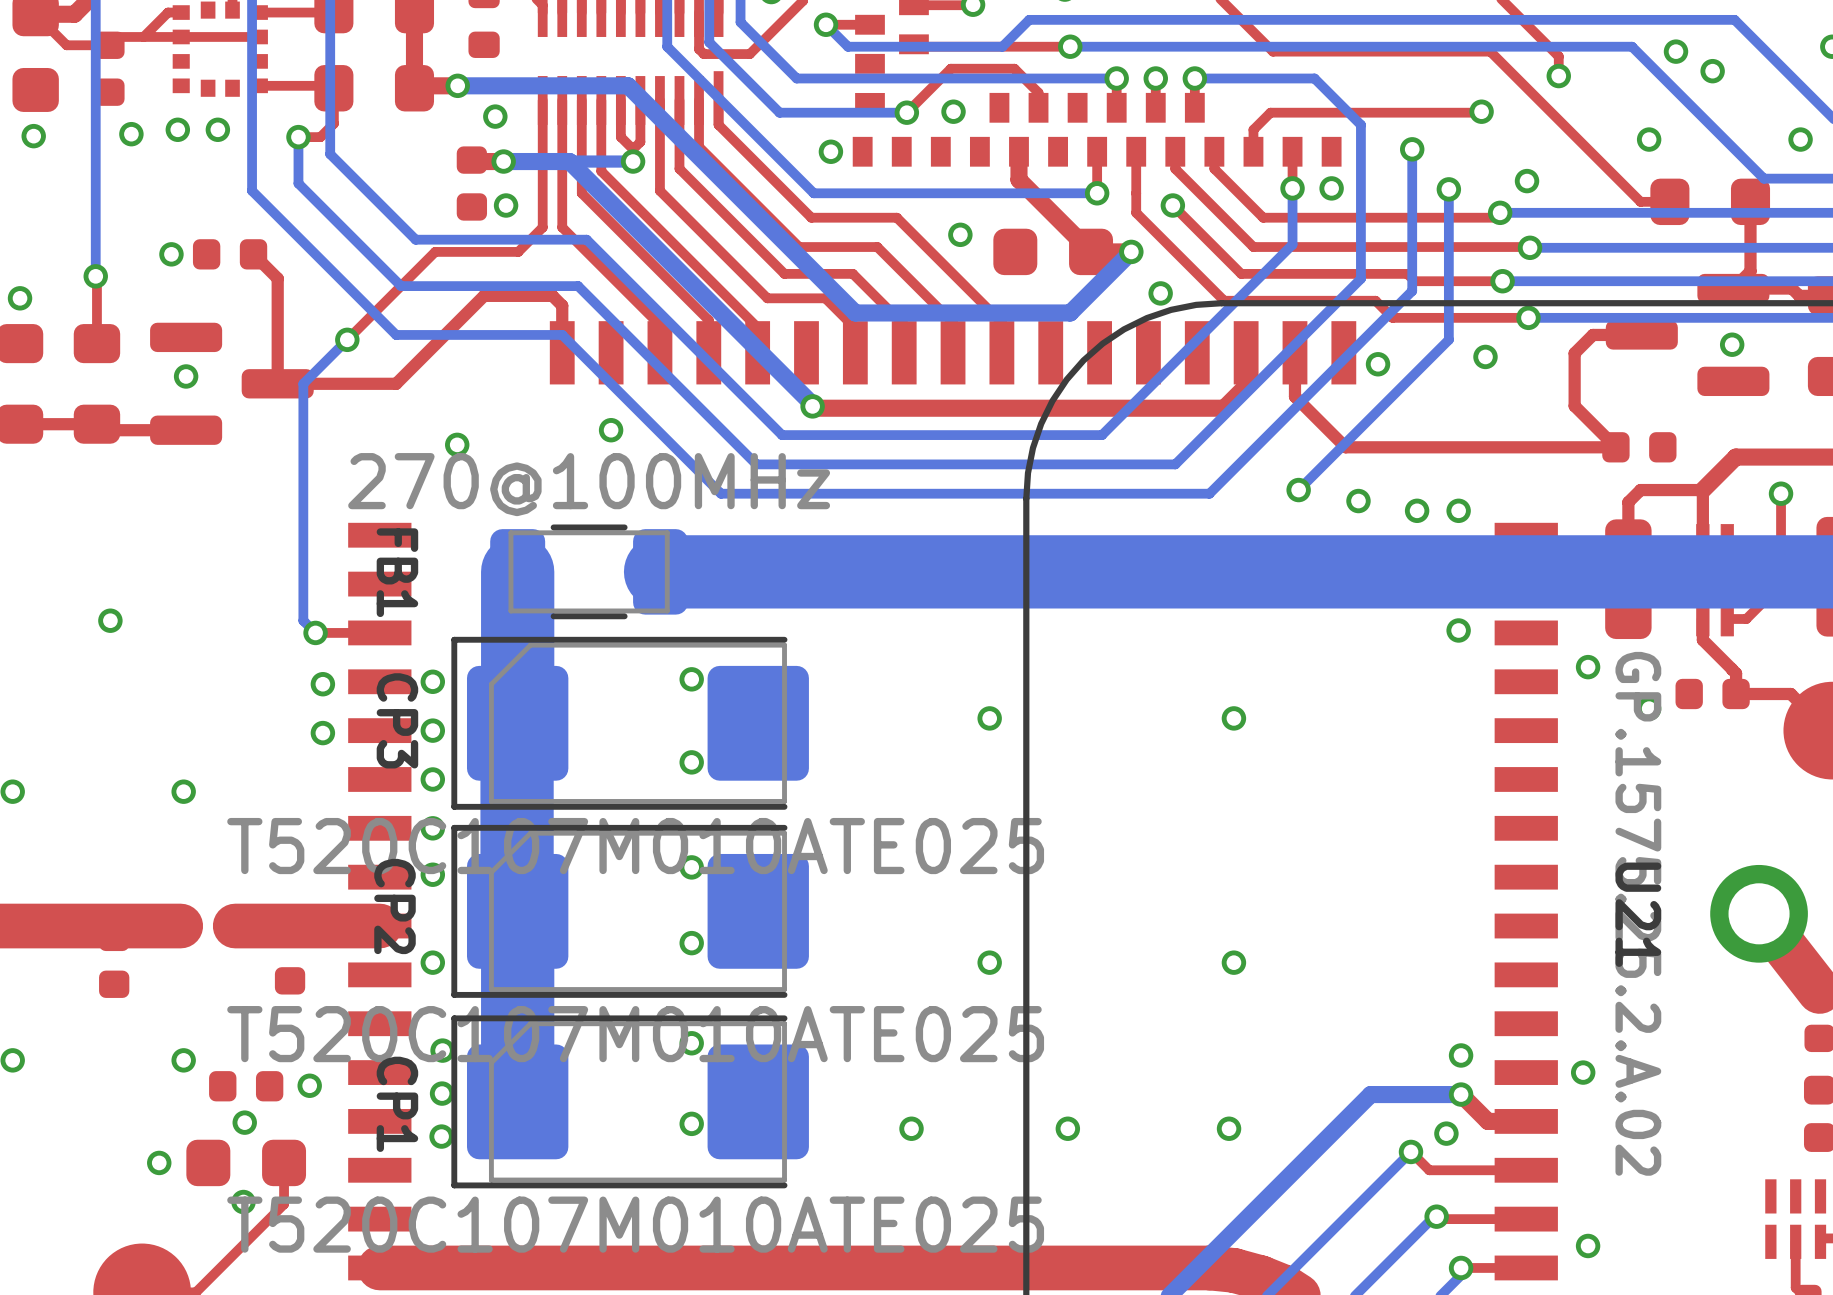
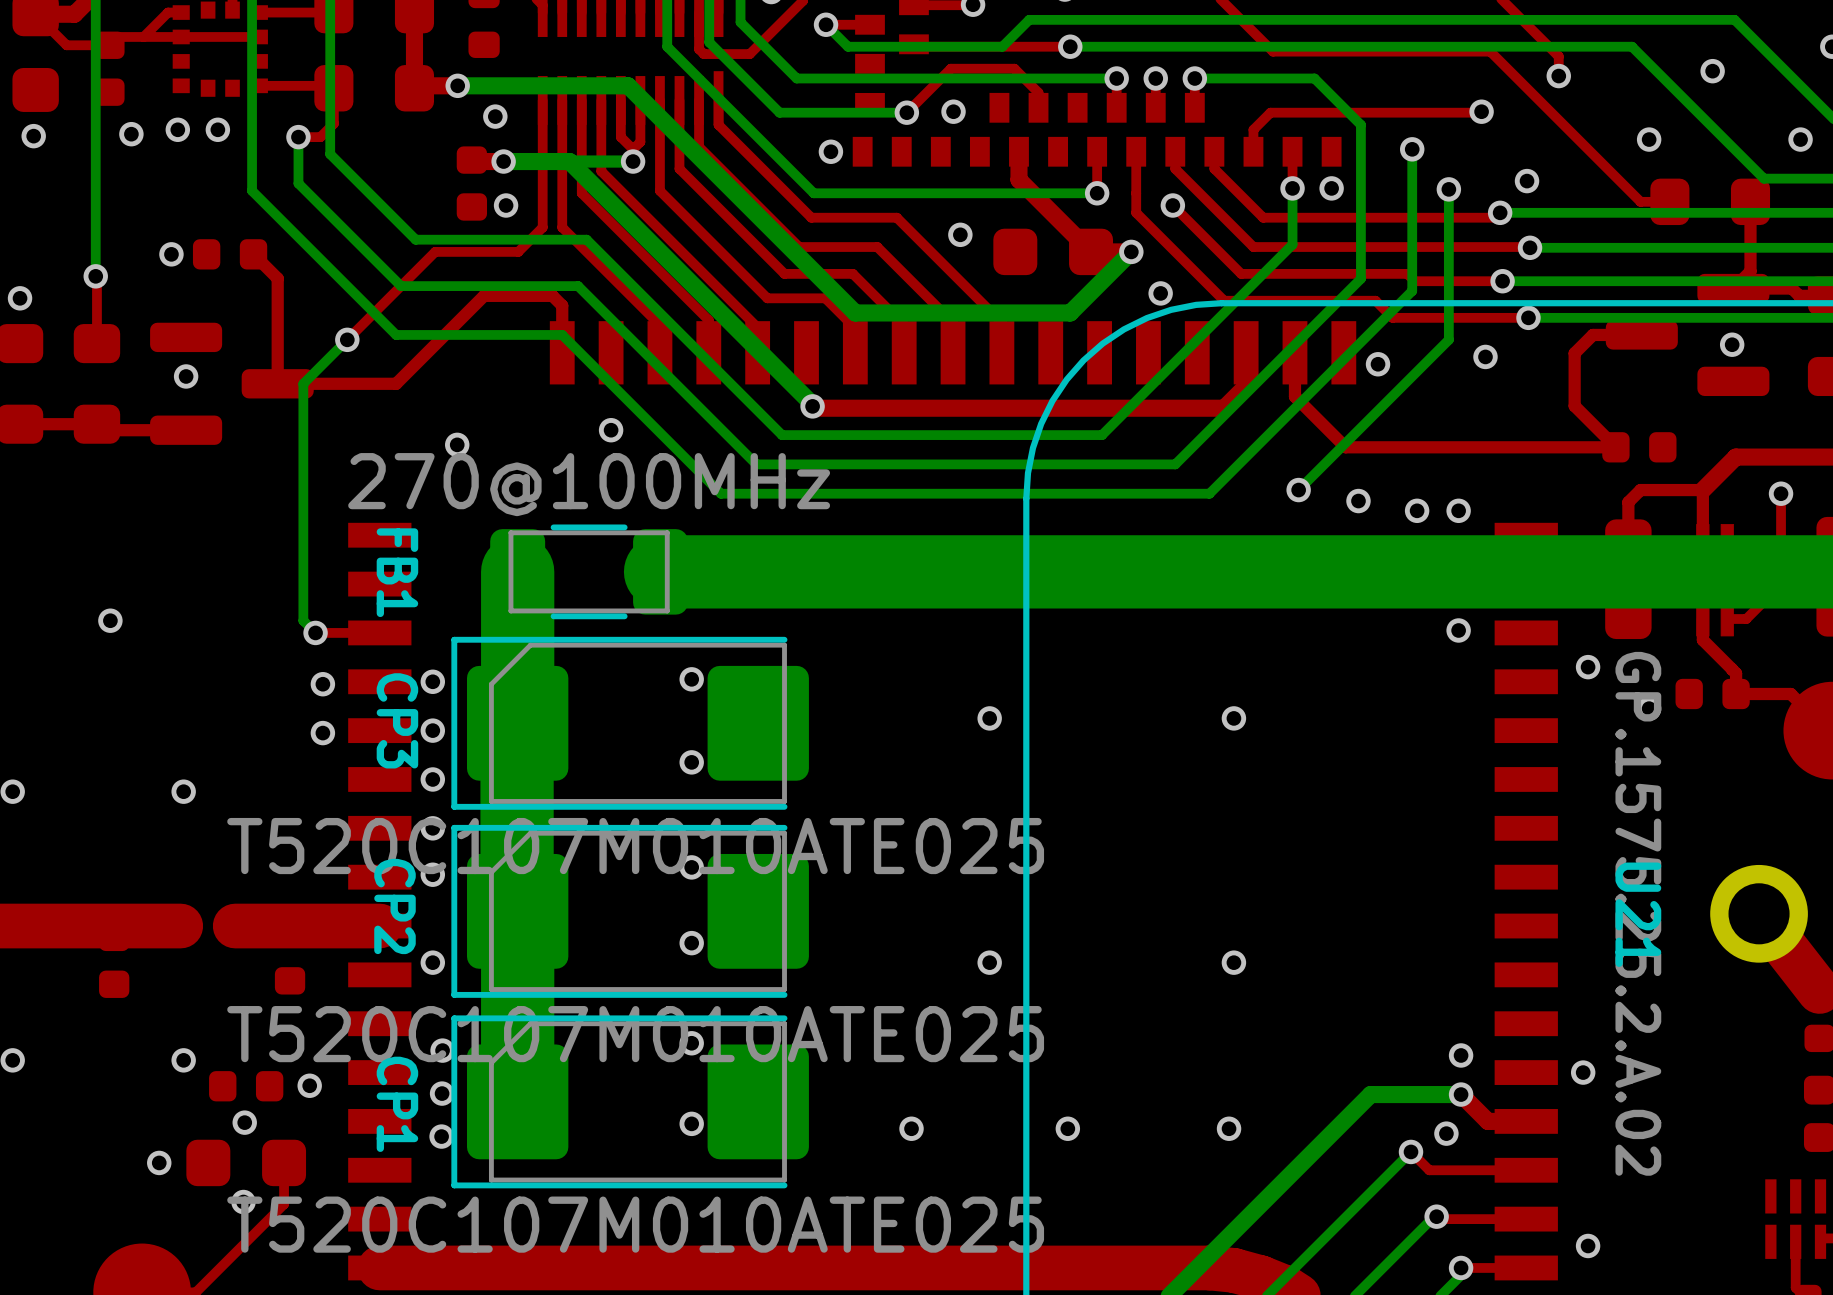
via: (1676, 51) -> none

